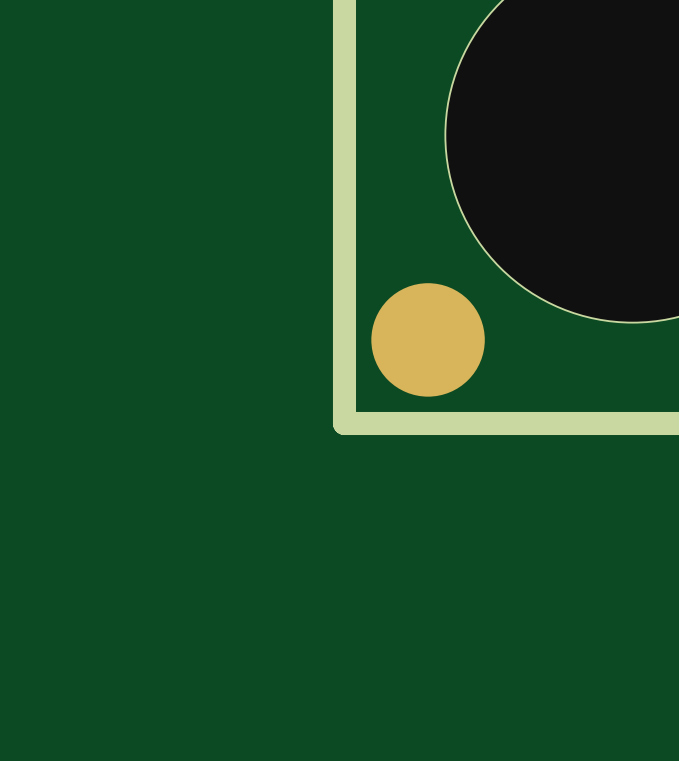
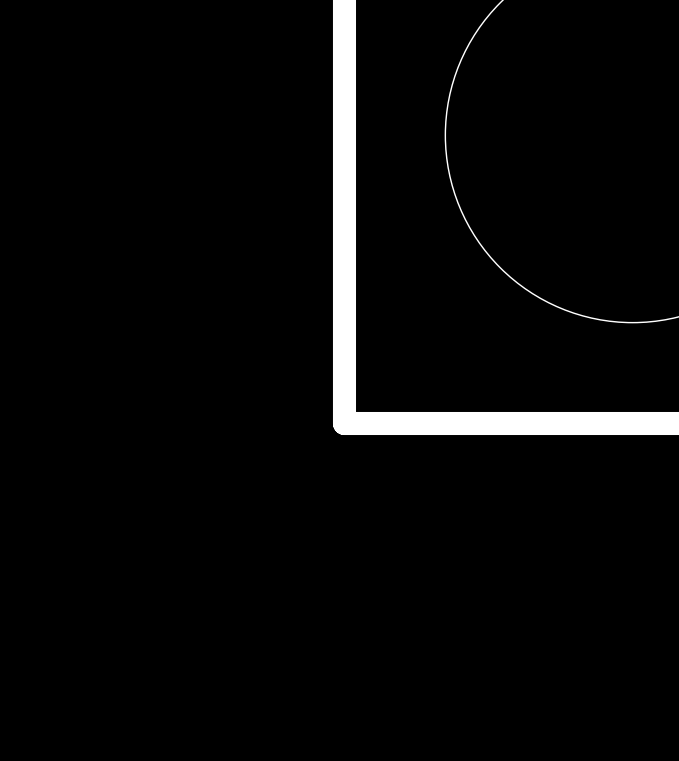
part: (428, 339) -> none

